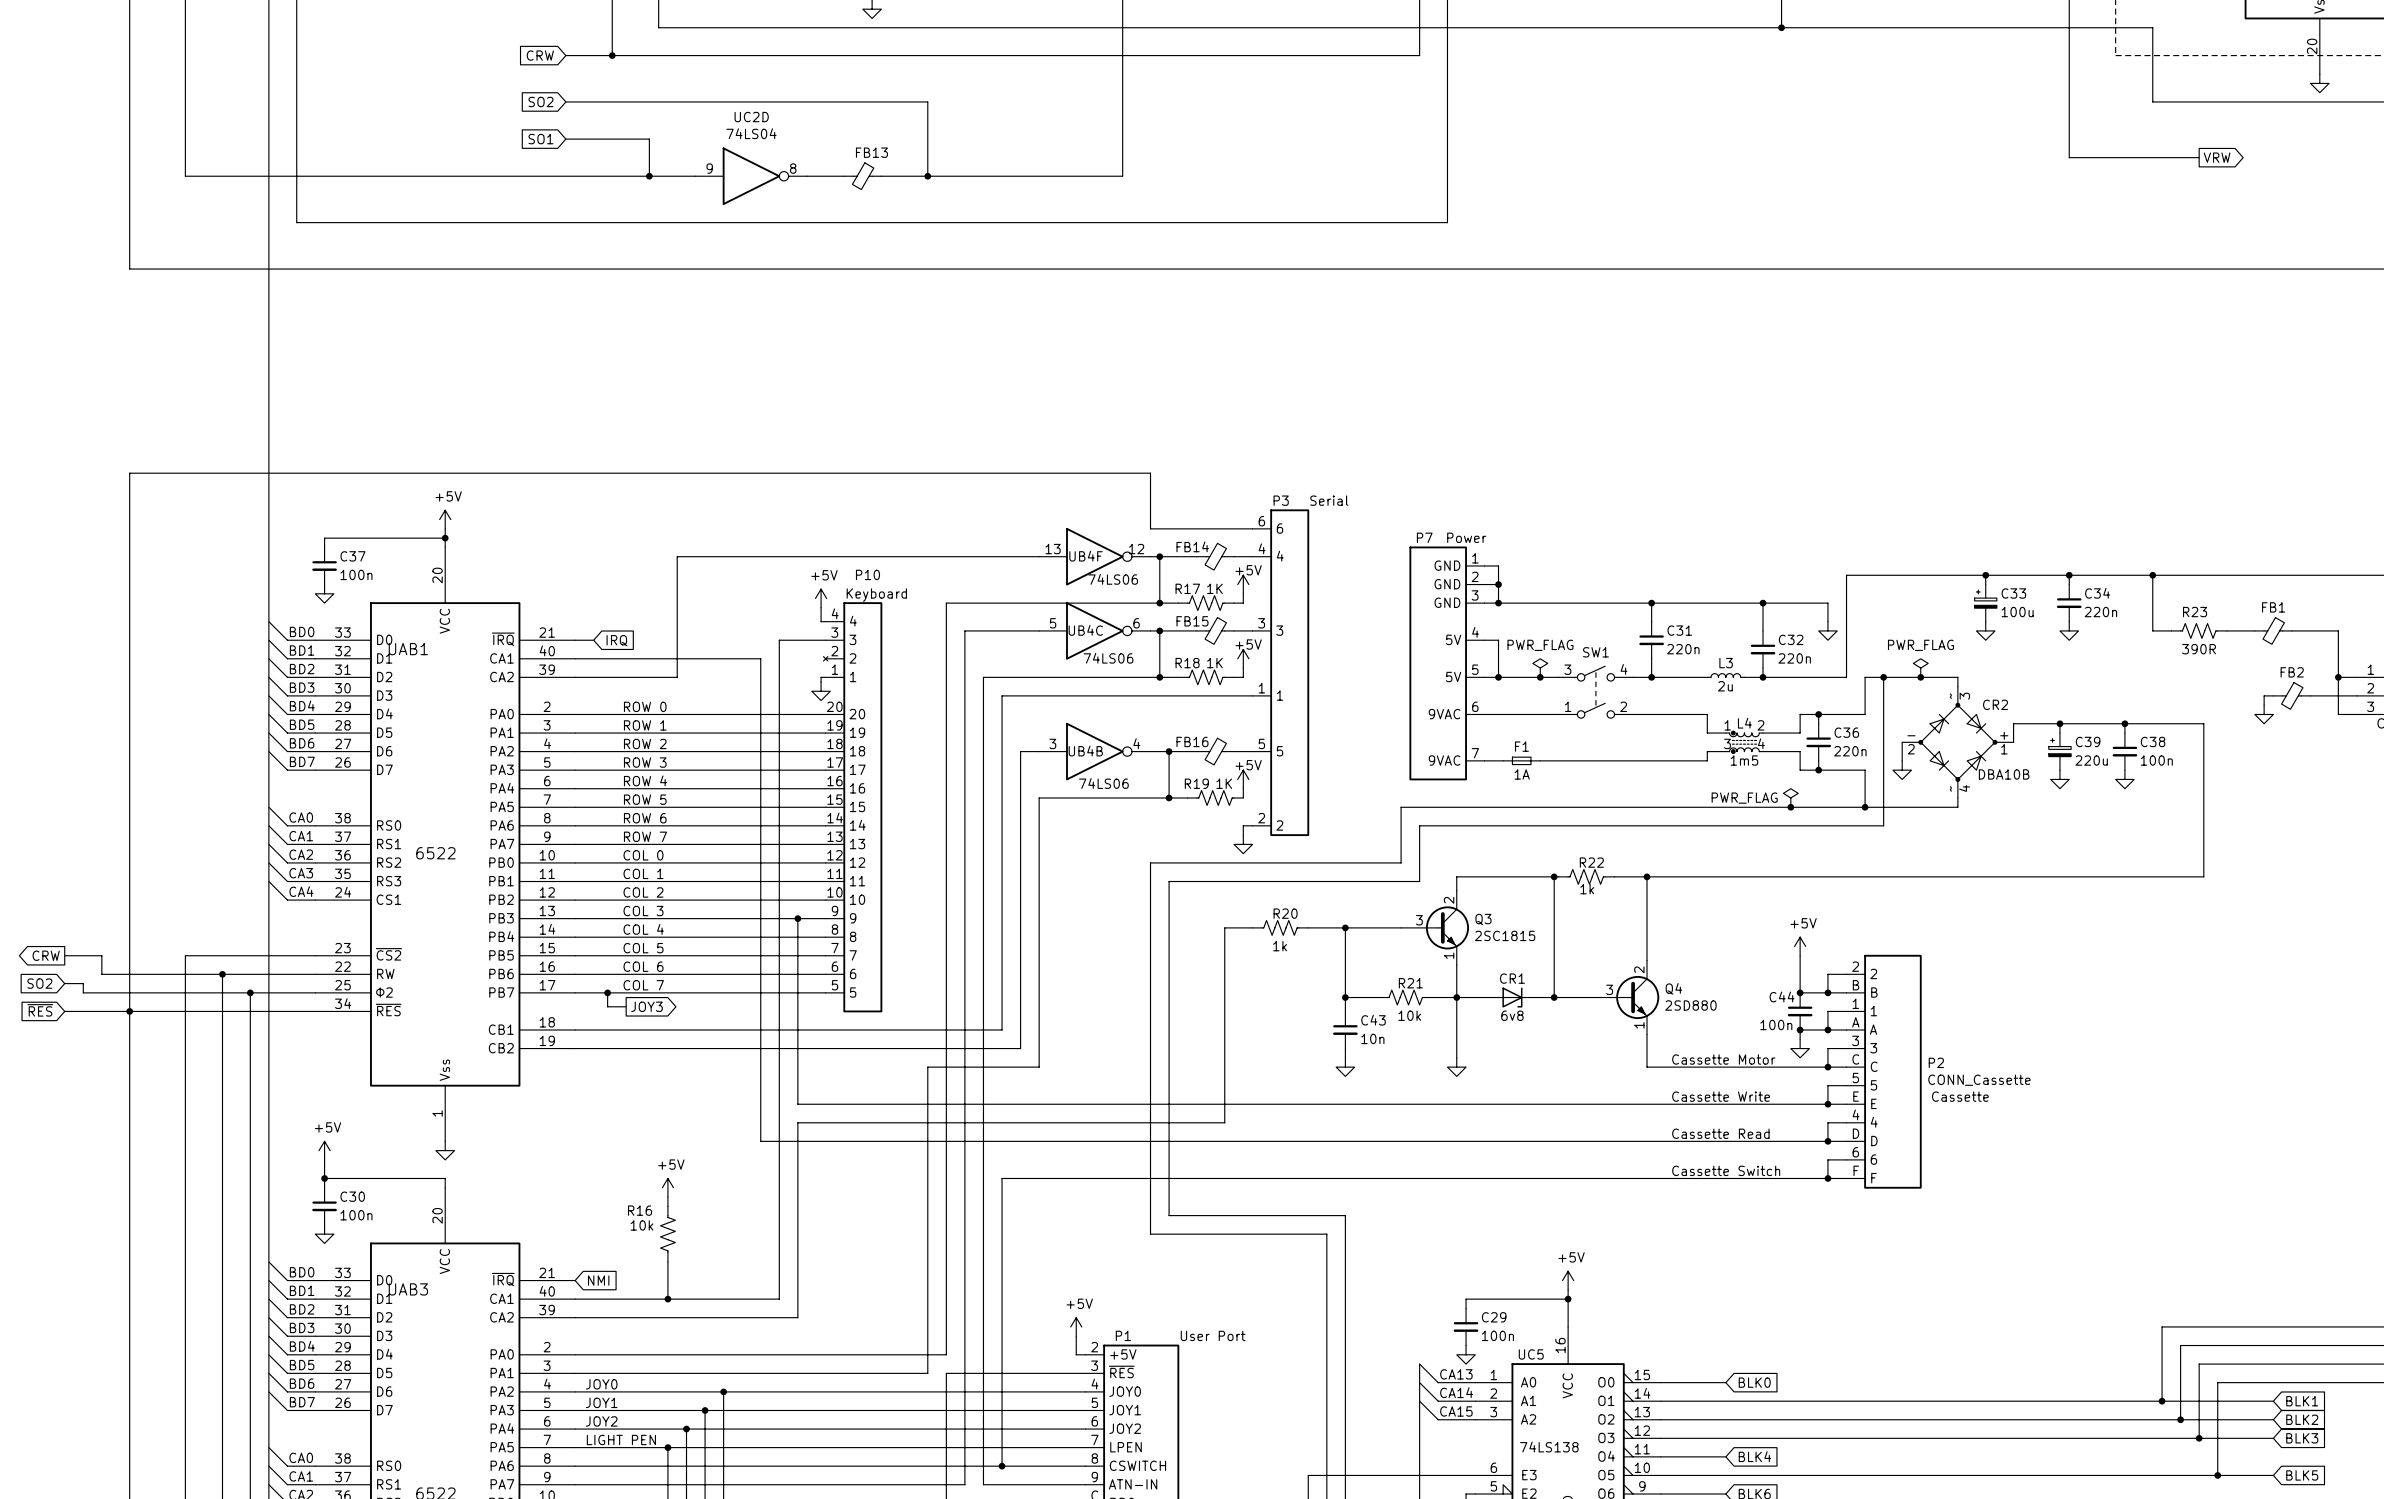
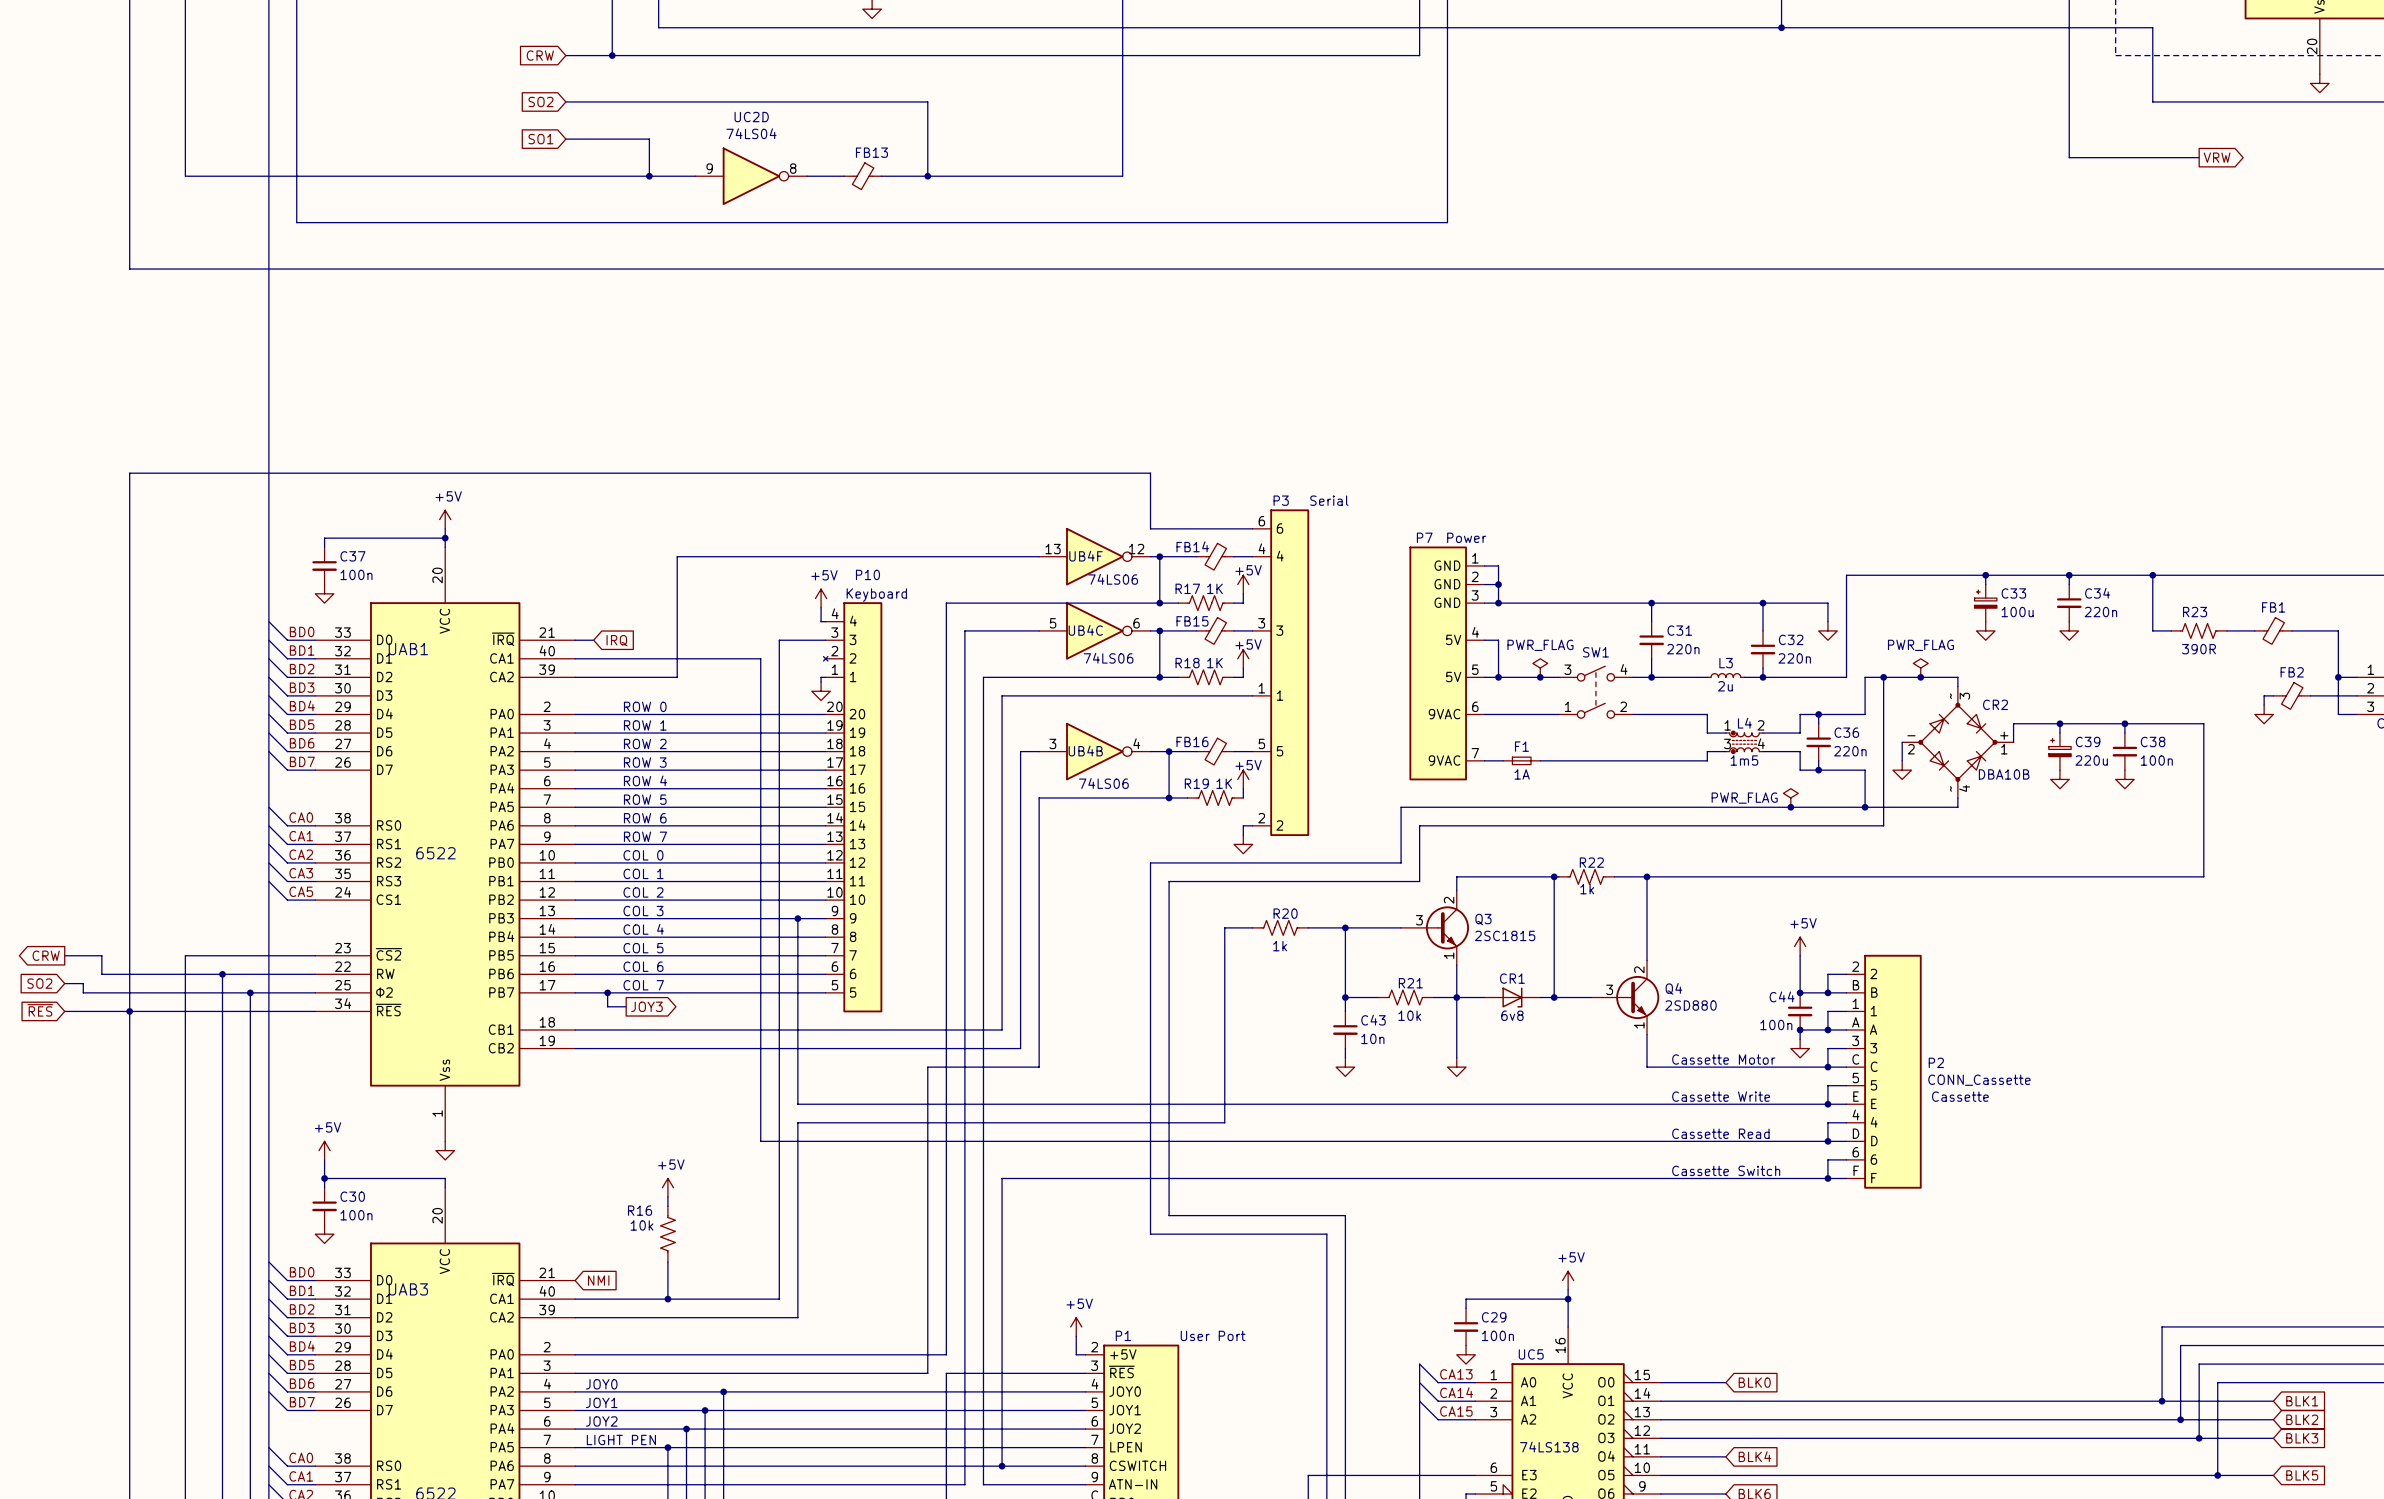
label: CA4 (301, 891) -> CA5 (301, 891)

